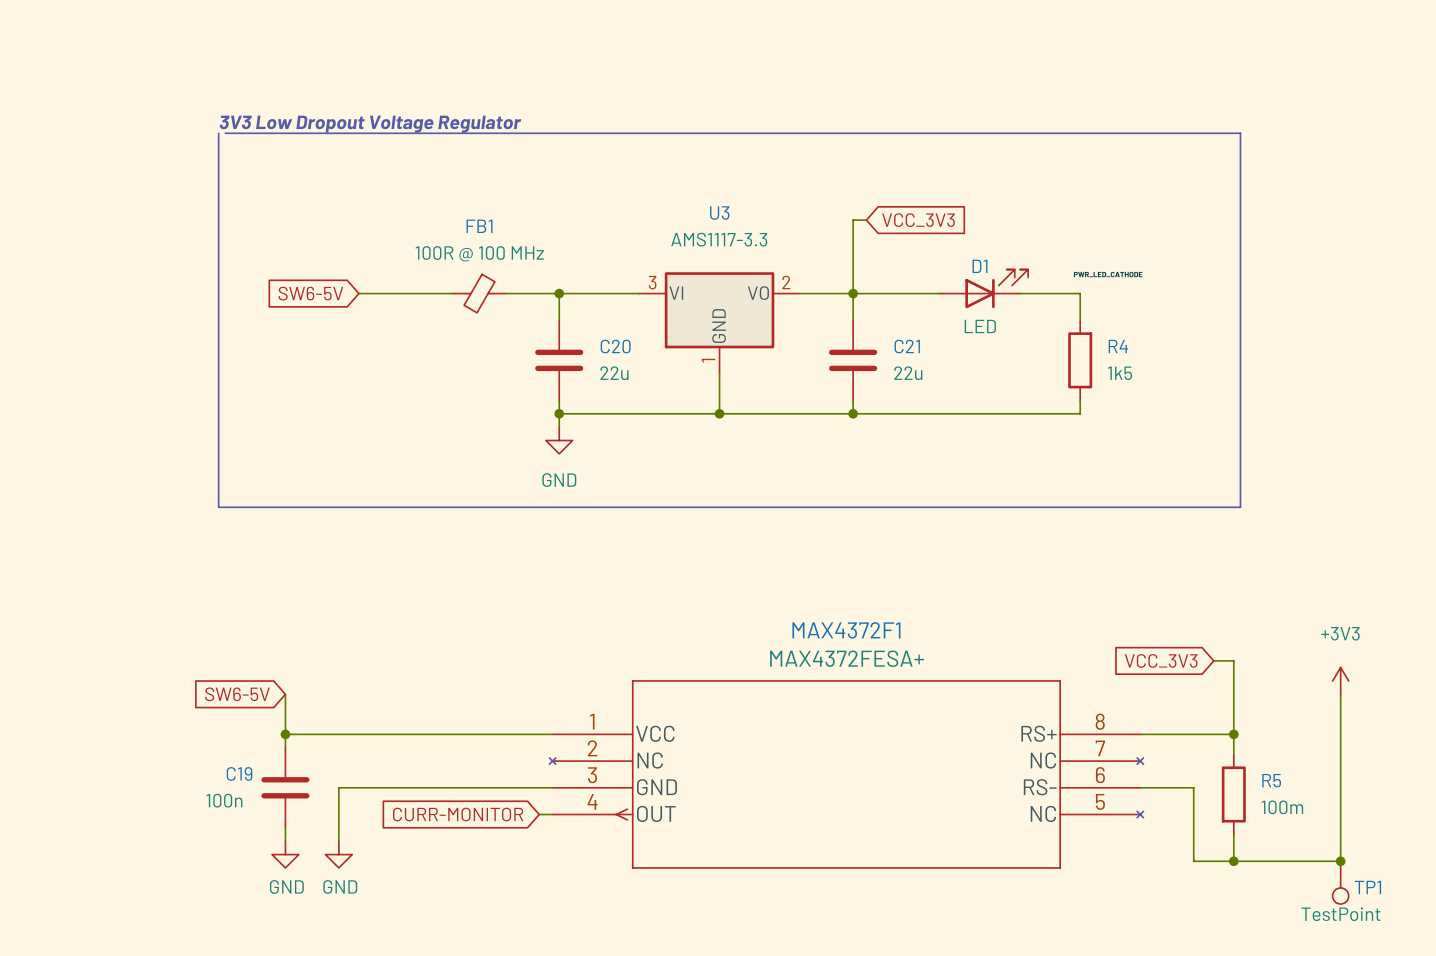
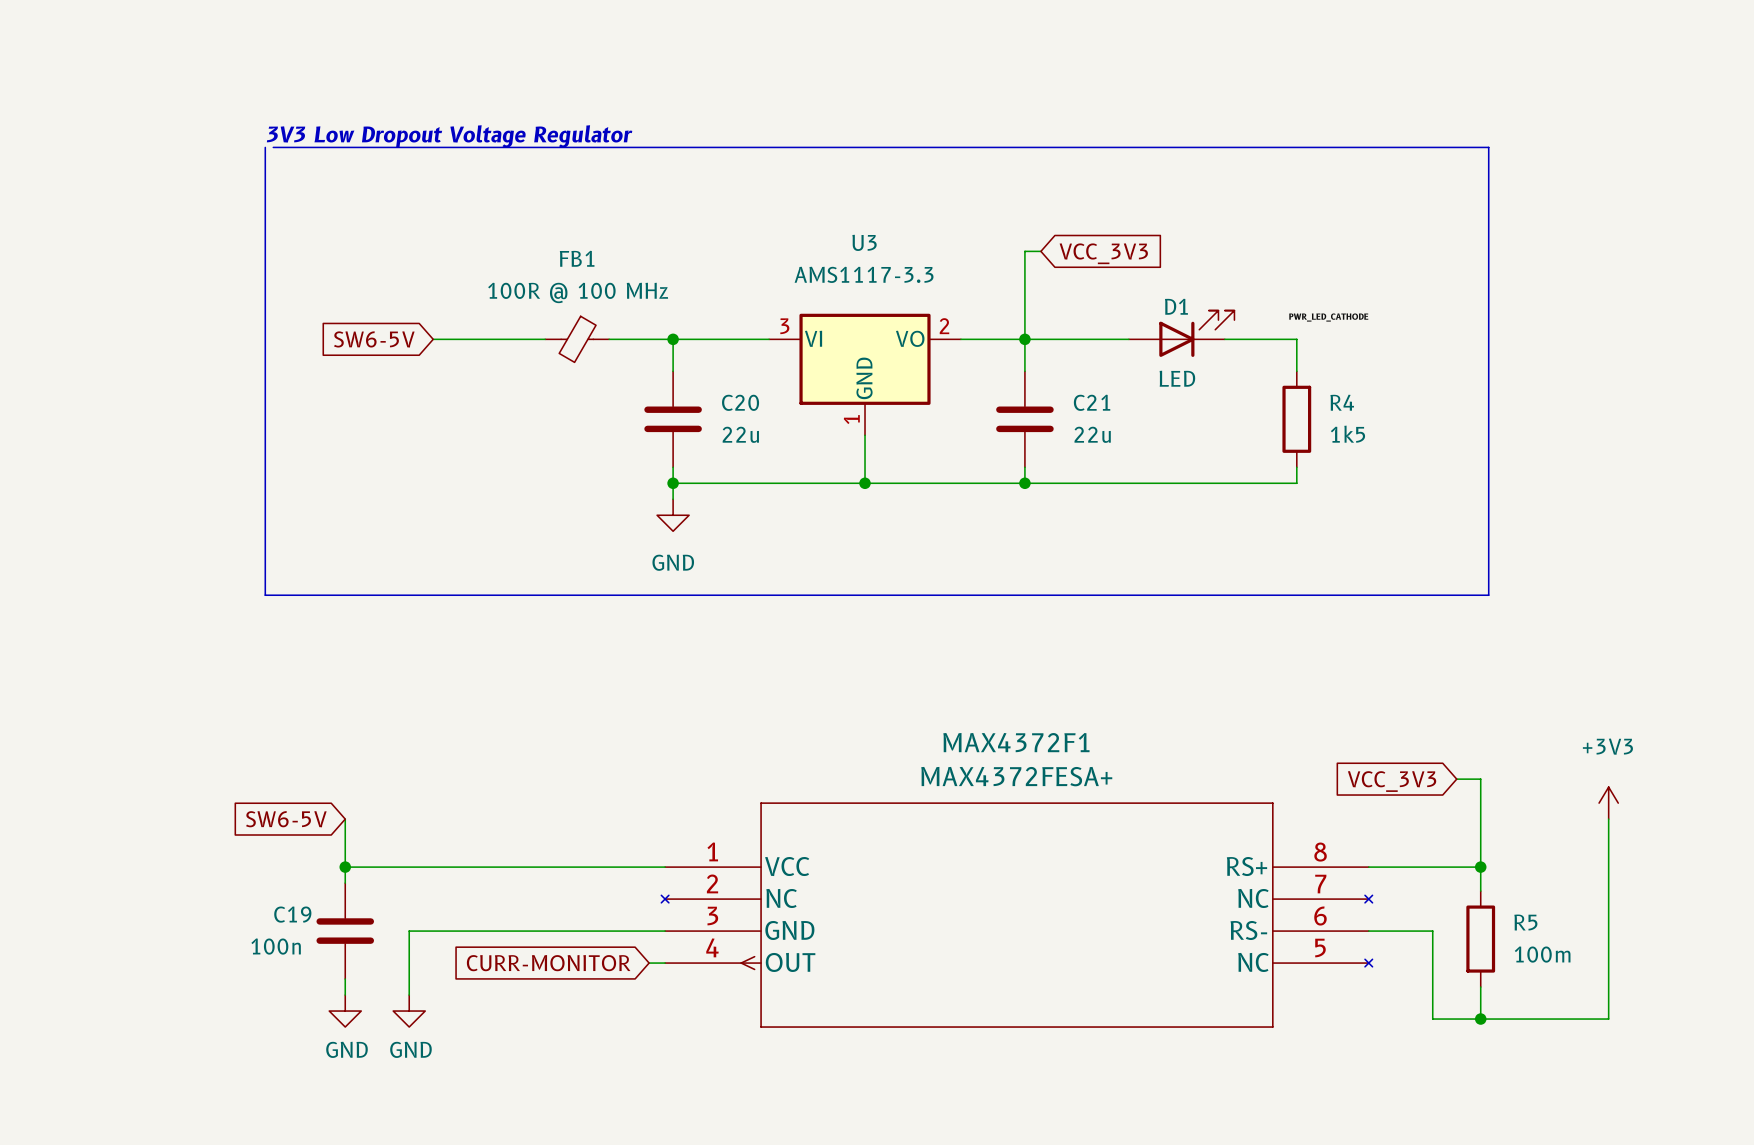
junction: (1340, 861) -> none
TP1: TestPoint (1340, 882) -> none

